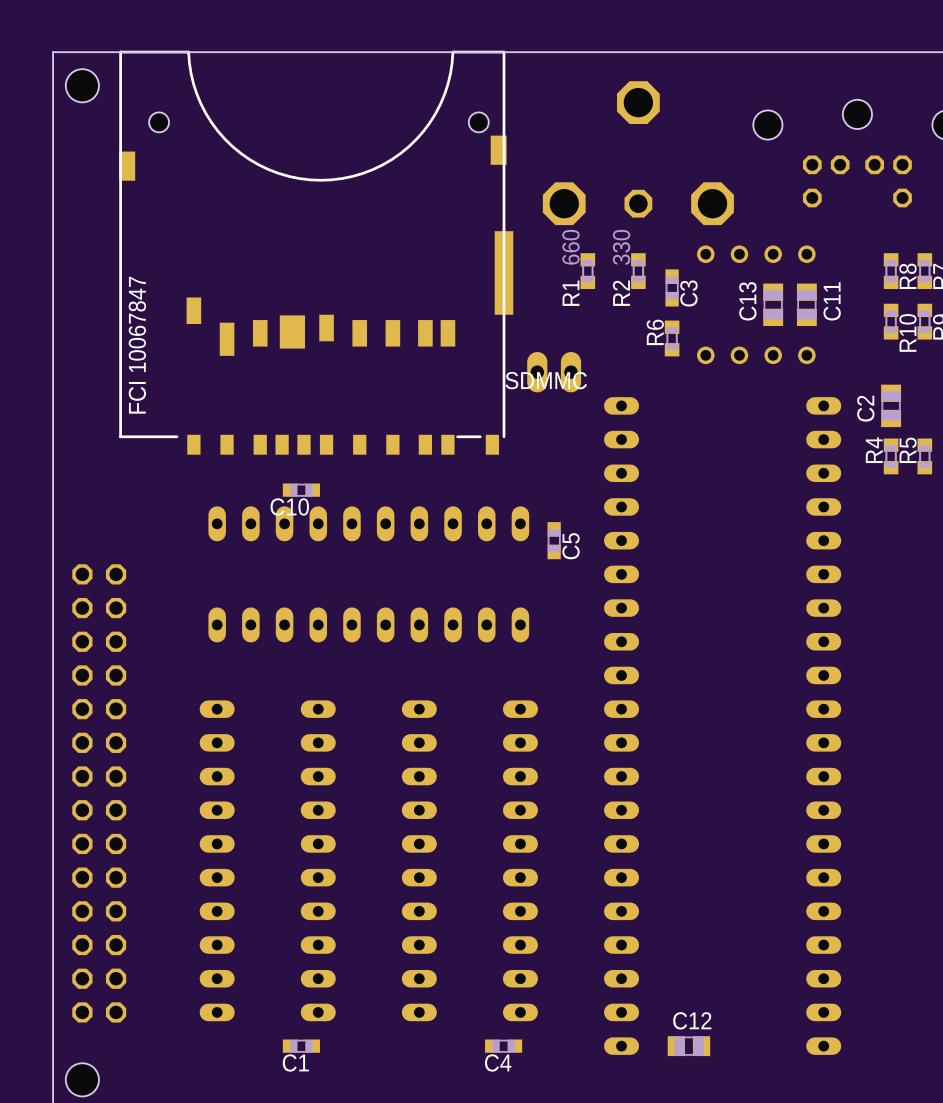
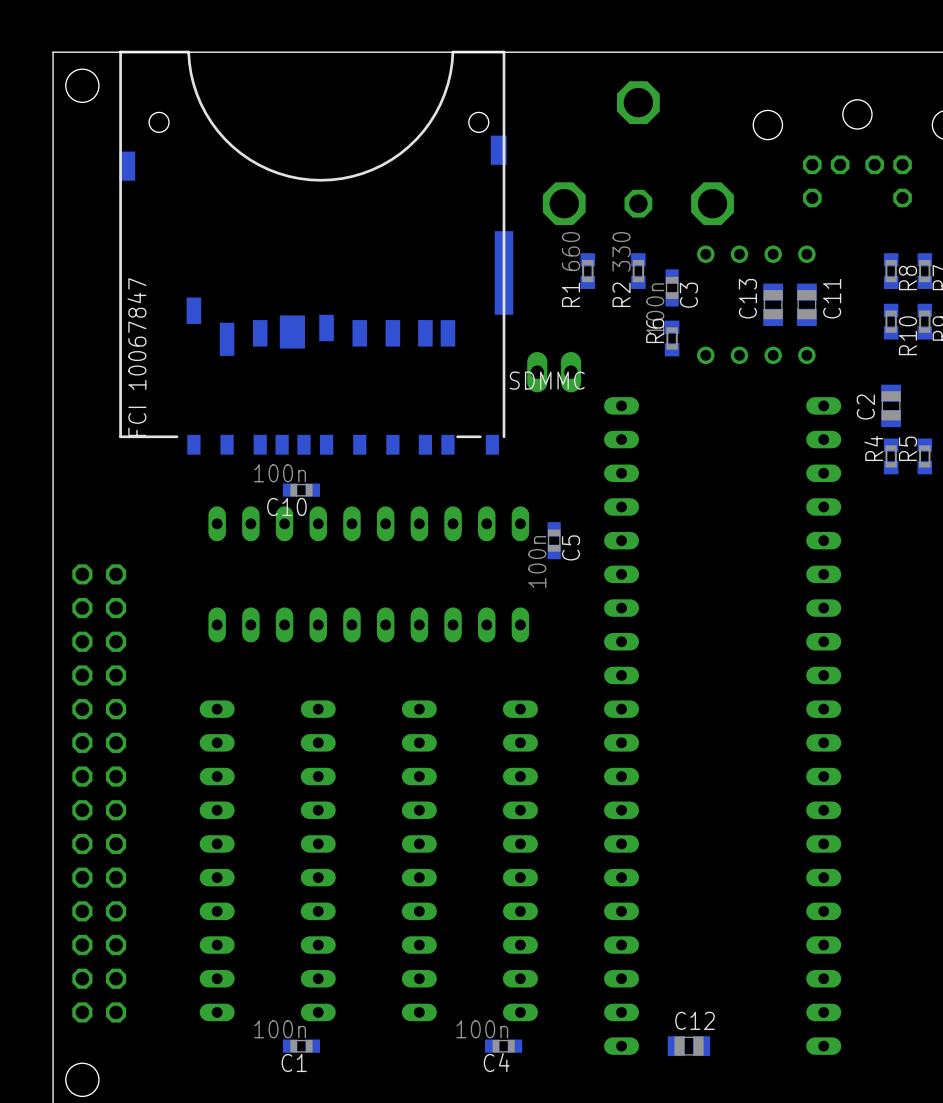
C3 value: none -> 100n (655, 309)
C10 value: none -> 100n (280, 473)
C5 value: none -> 100n (537, 562)
C1 value: none -> 100n (280, 1029)
C4 value: none -> 100n (482, 1029)

